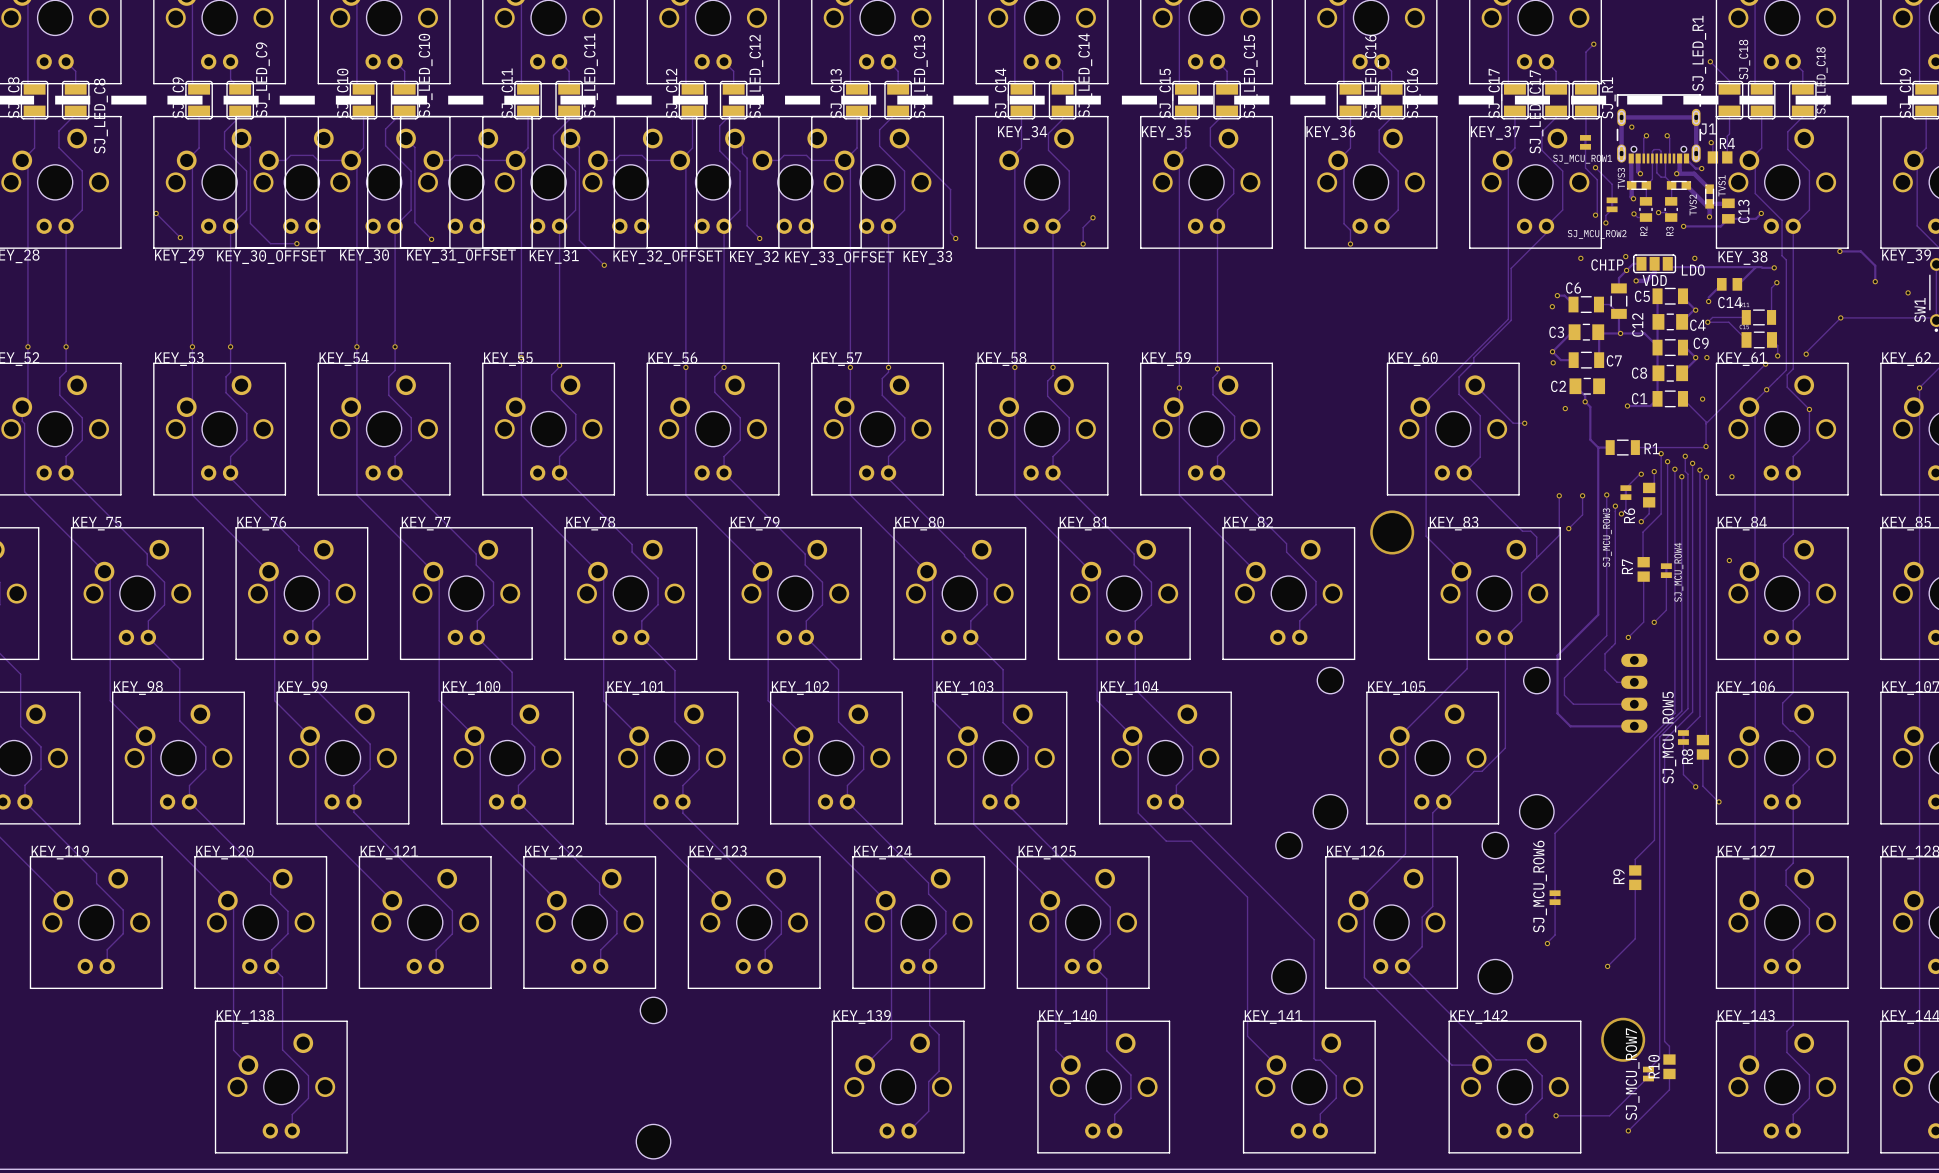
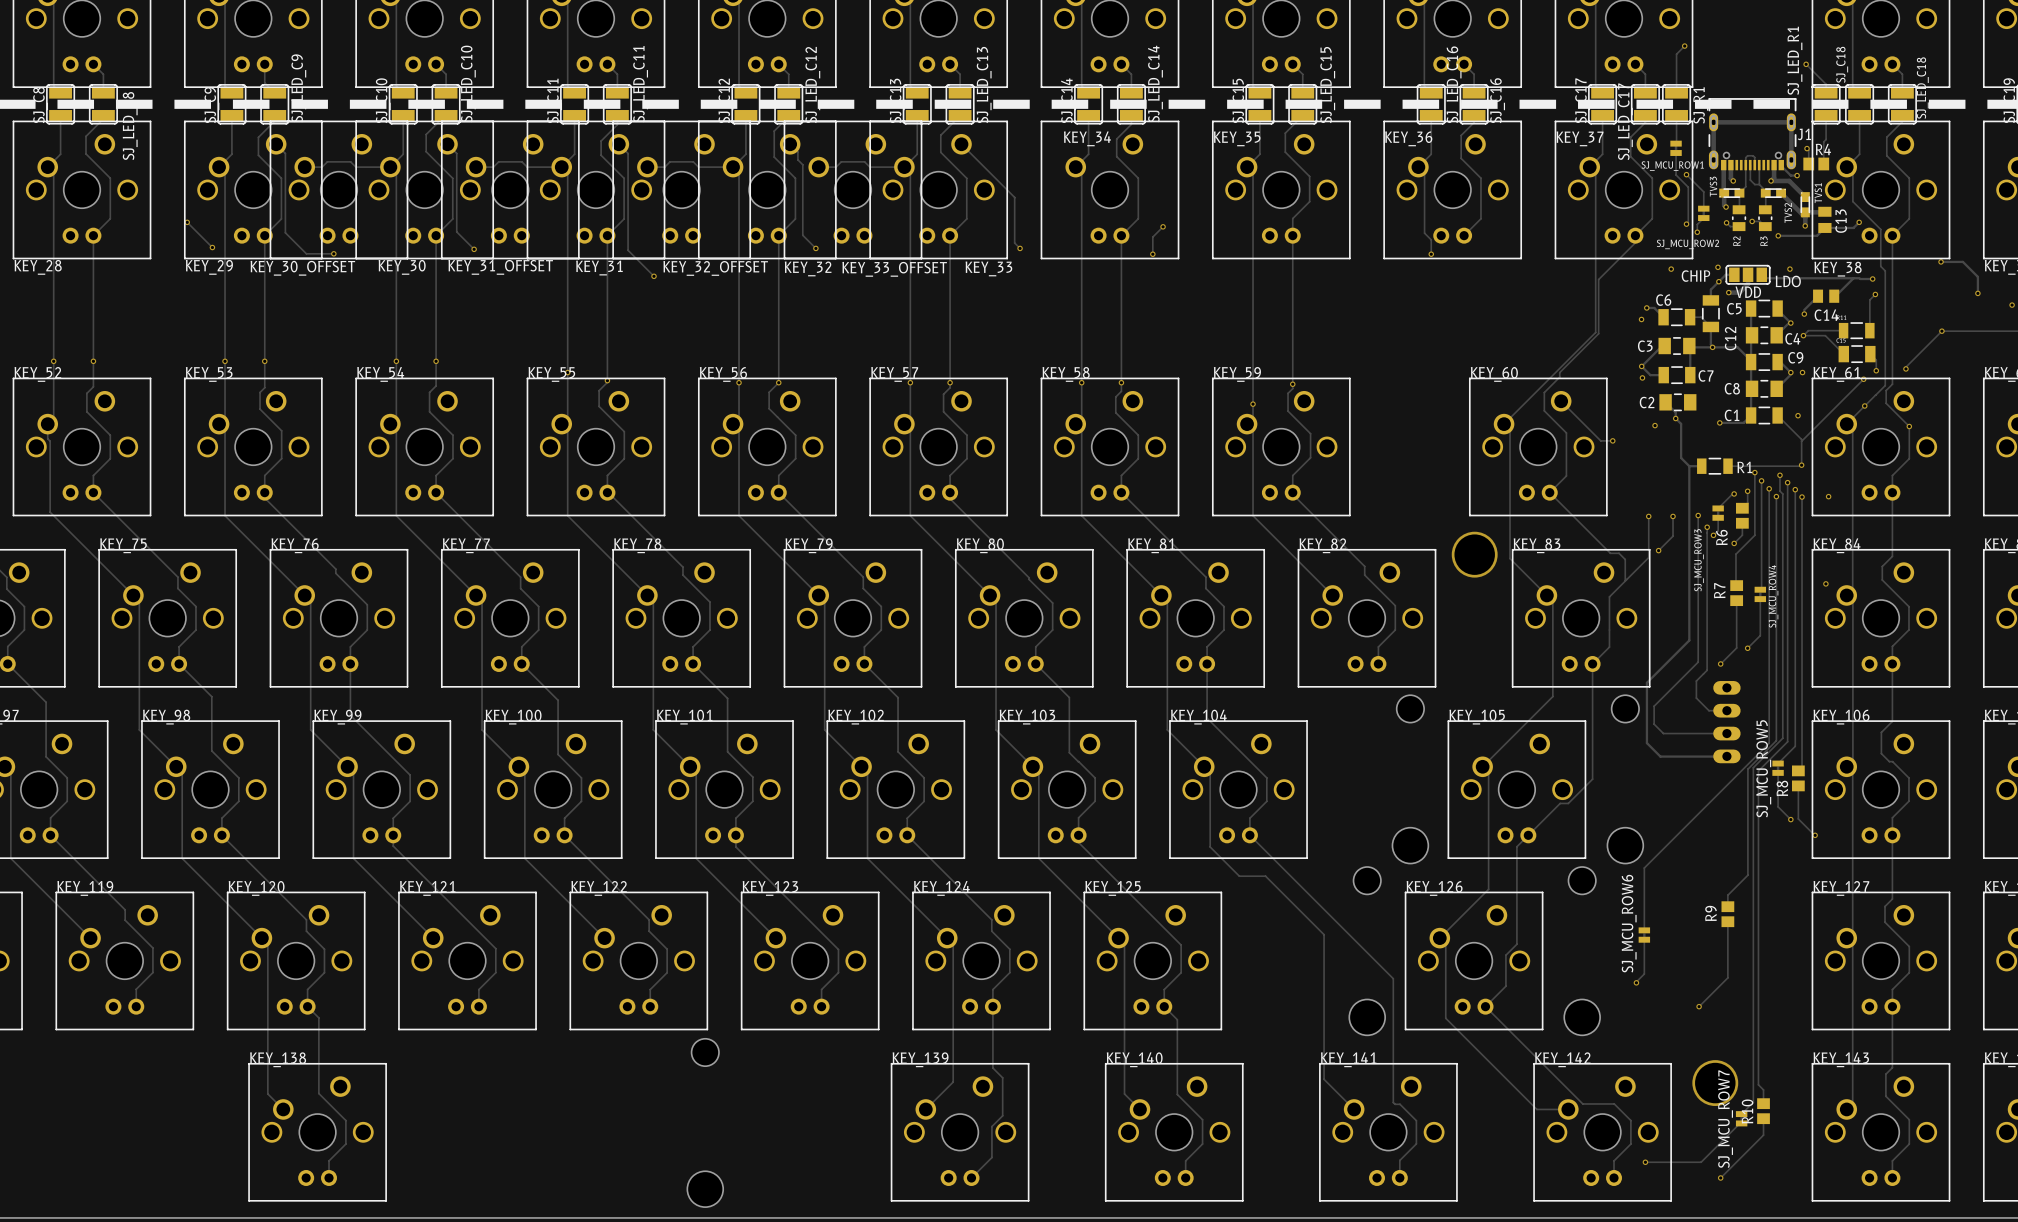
via: (1631, 127) -> none
track: (1646, 135) (1643, 138) (1643, 158) -> none
via: (1646, 135) -> none
track: (1667, 135) (1669, 138) (1669, 158) -> none
via: (1667, 135) -> none

